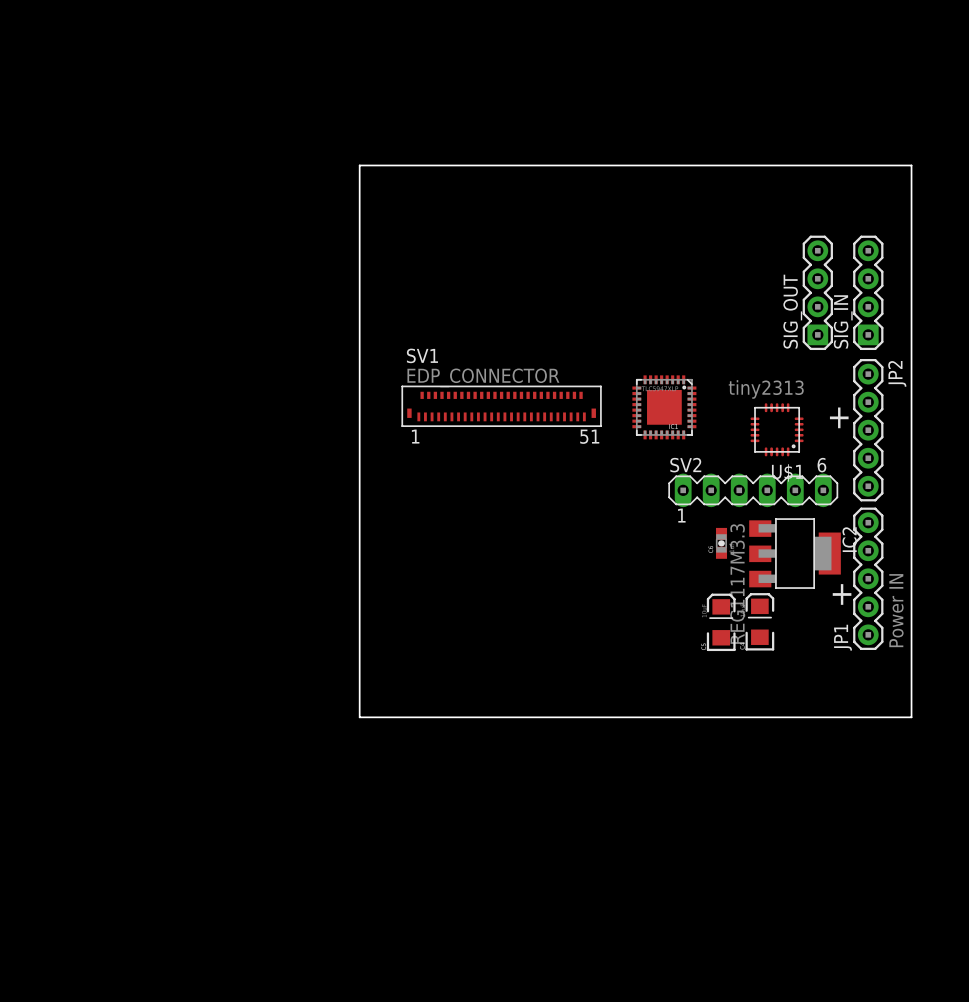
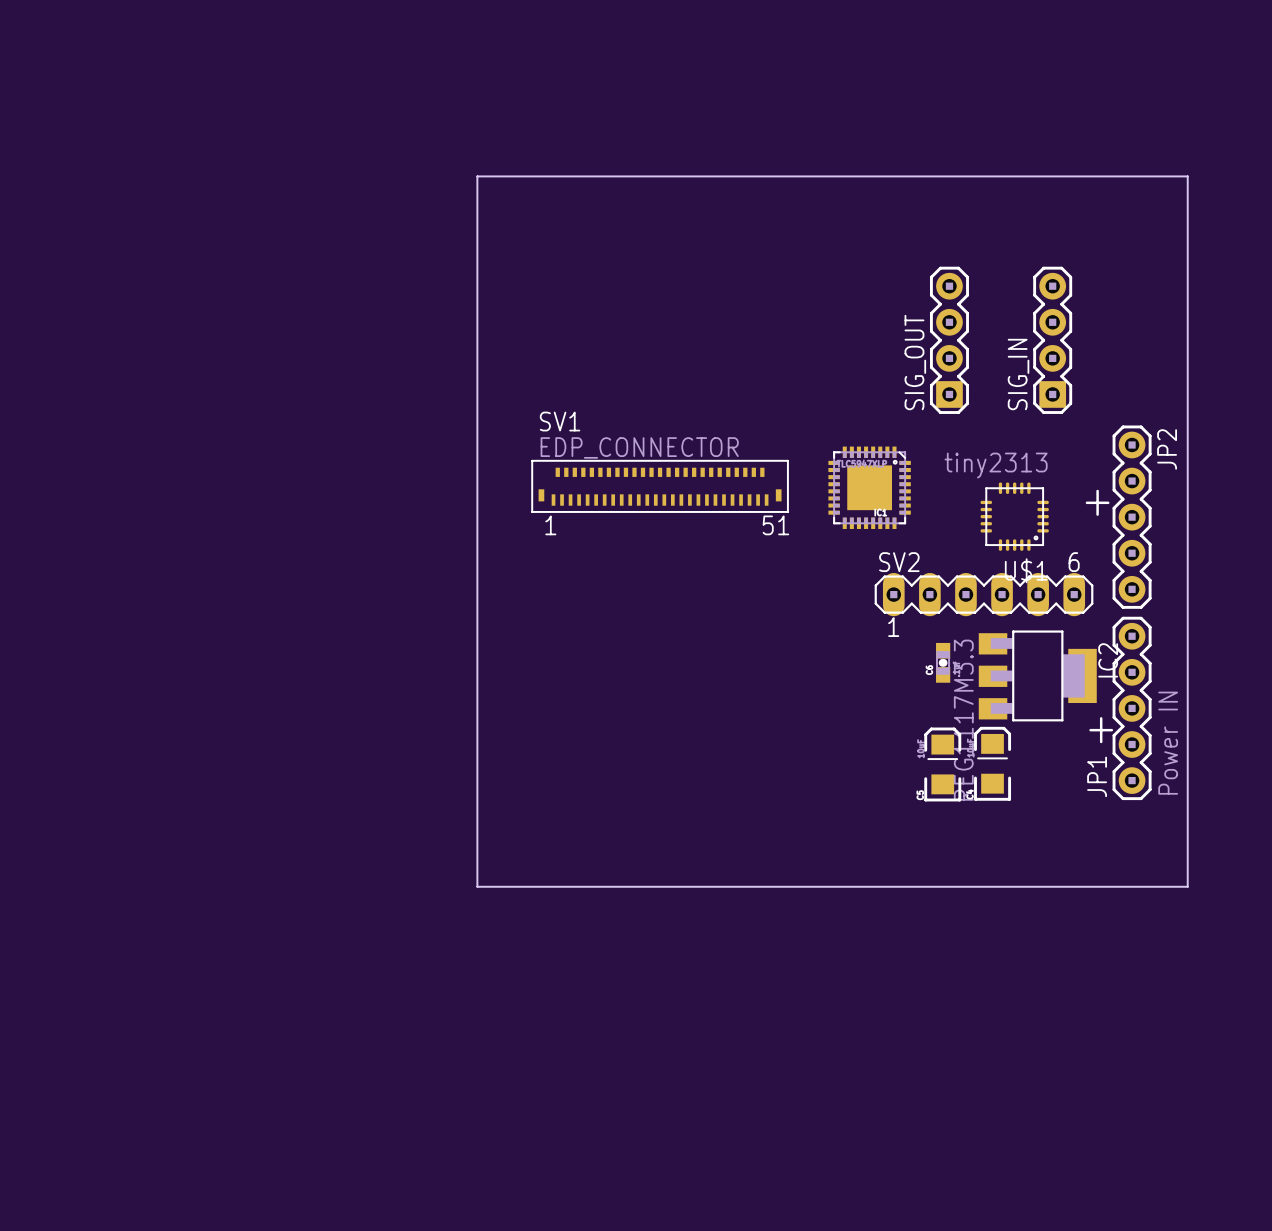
SIG_OUT position: (817, 292) -> (949, 340)
SIG_IN position: (868, 292) -> (1052, 340)

